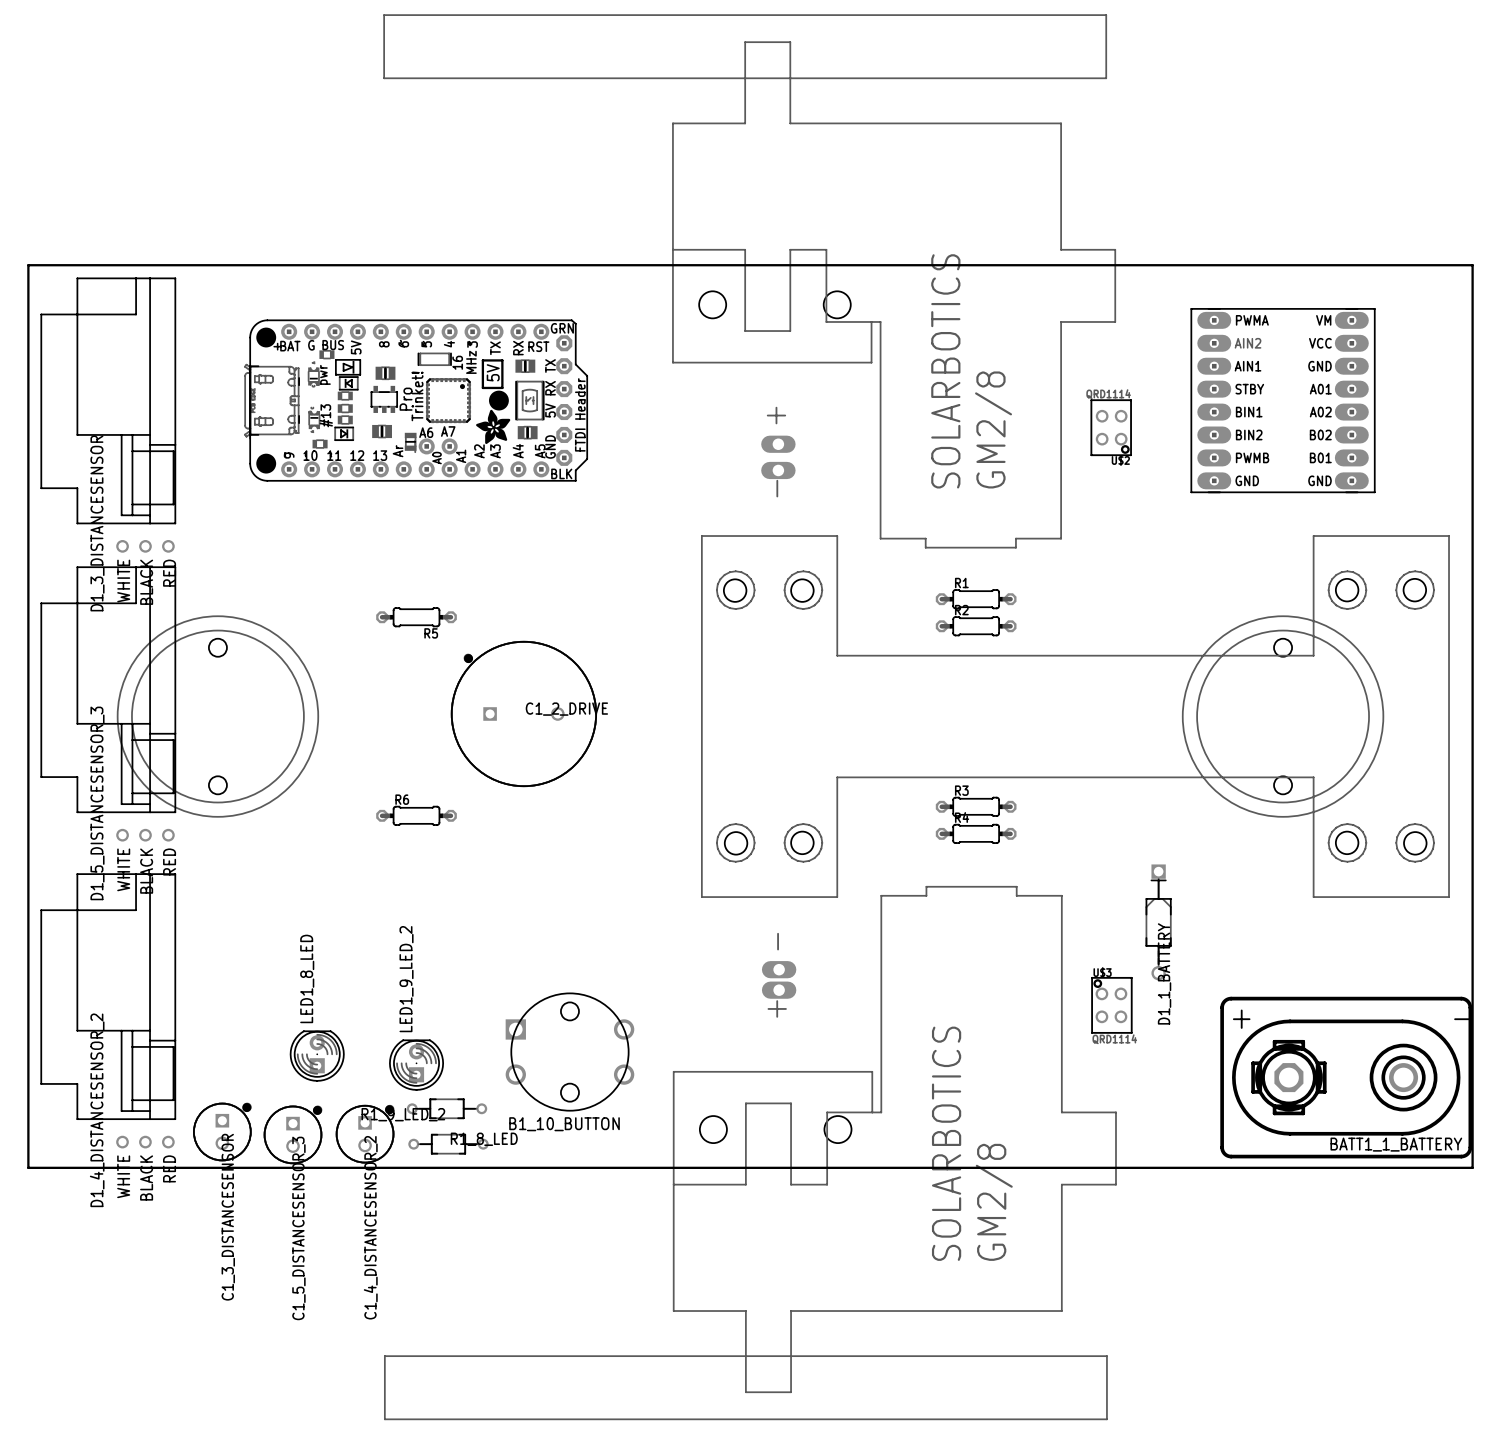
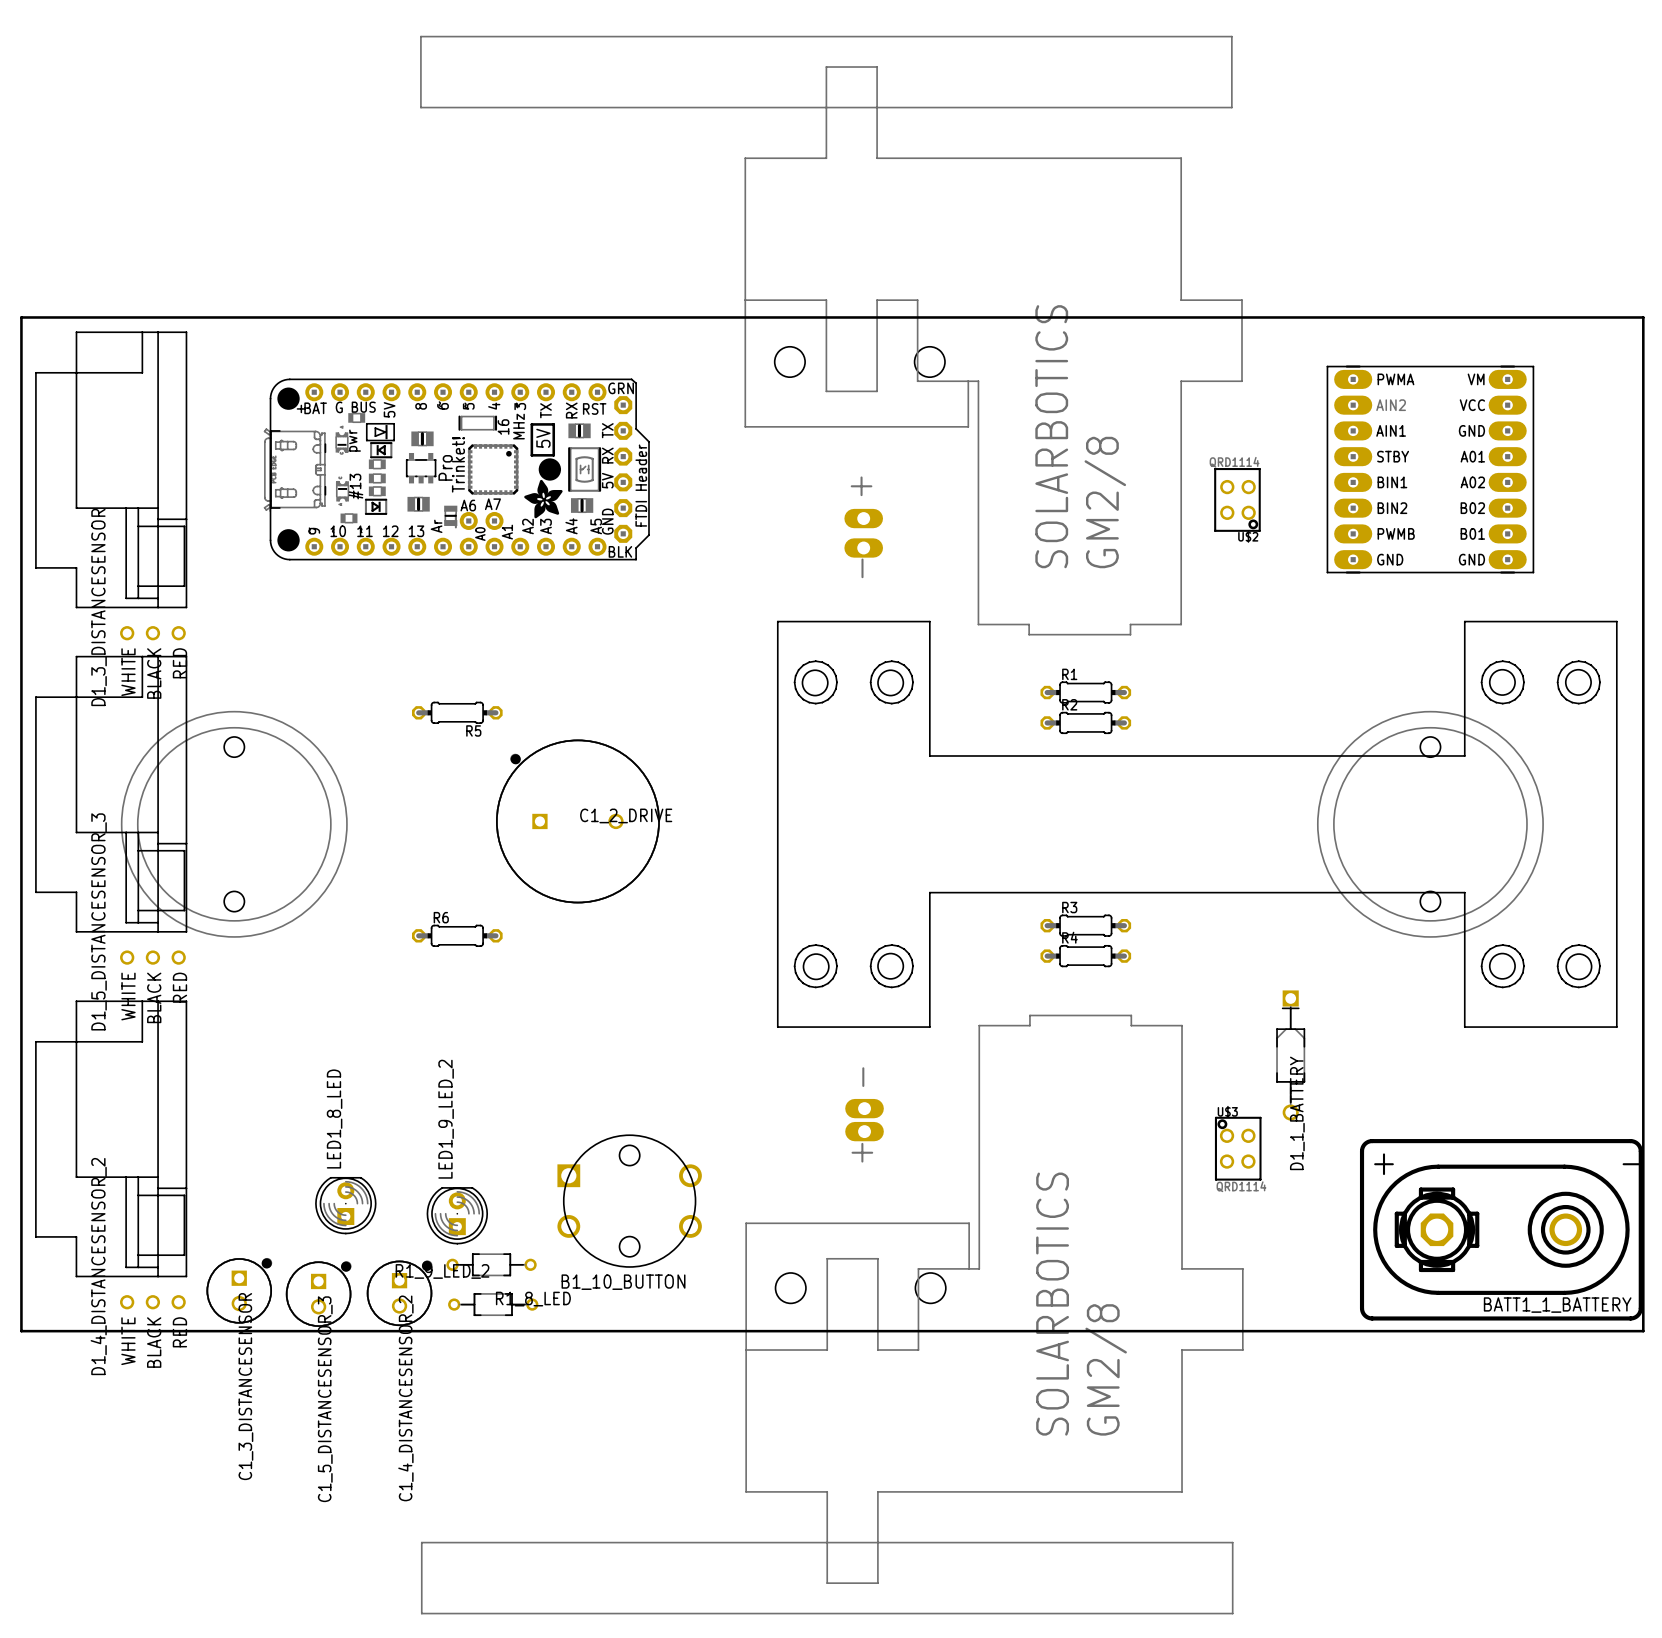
part footprint: [701, 536, 1450, 898] -> [777, 621, 1617, 1028]

